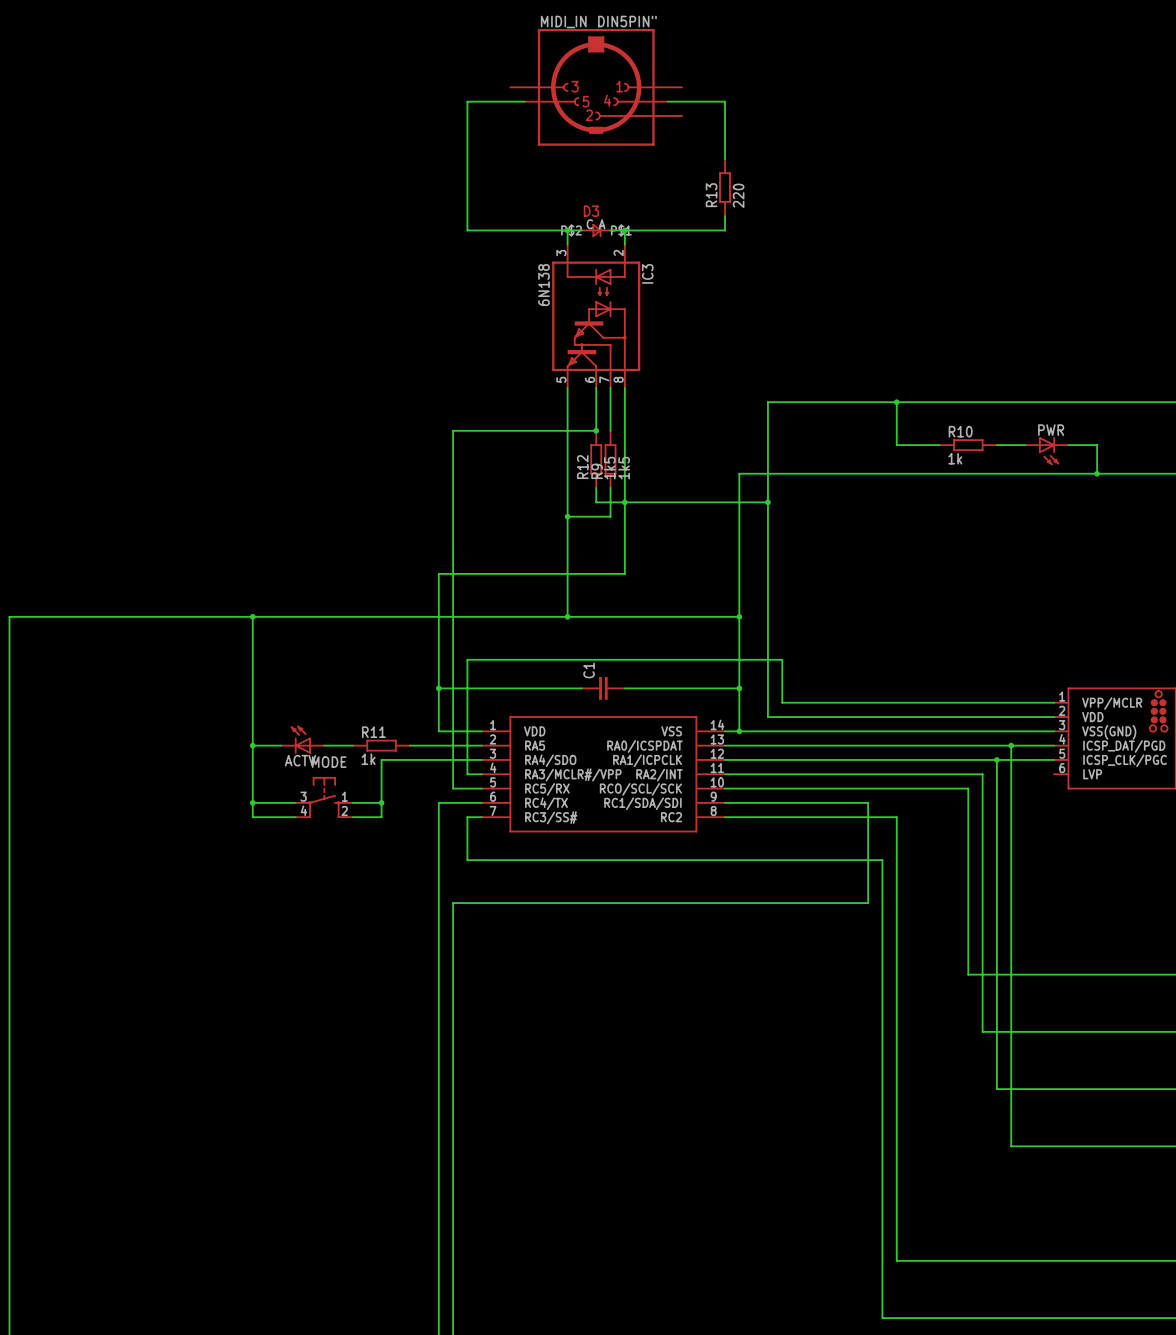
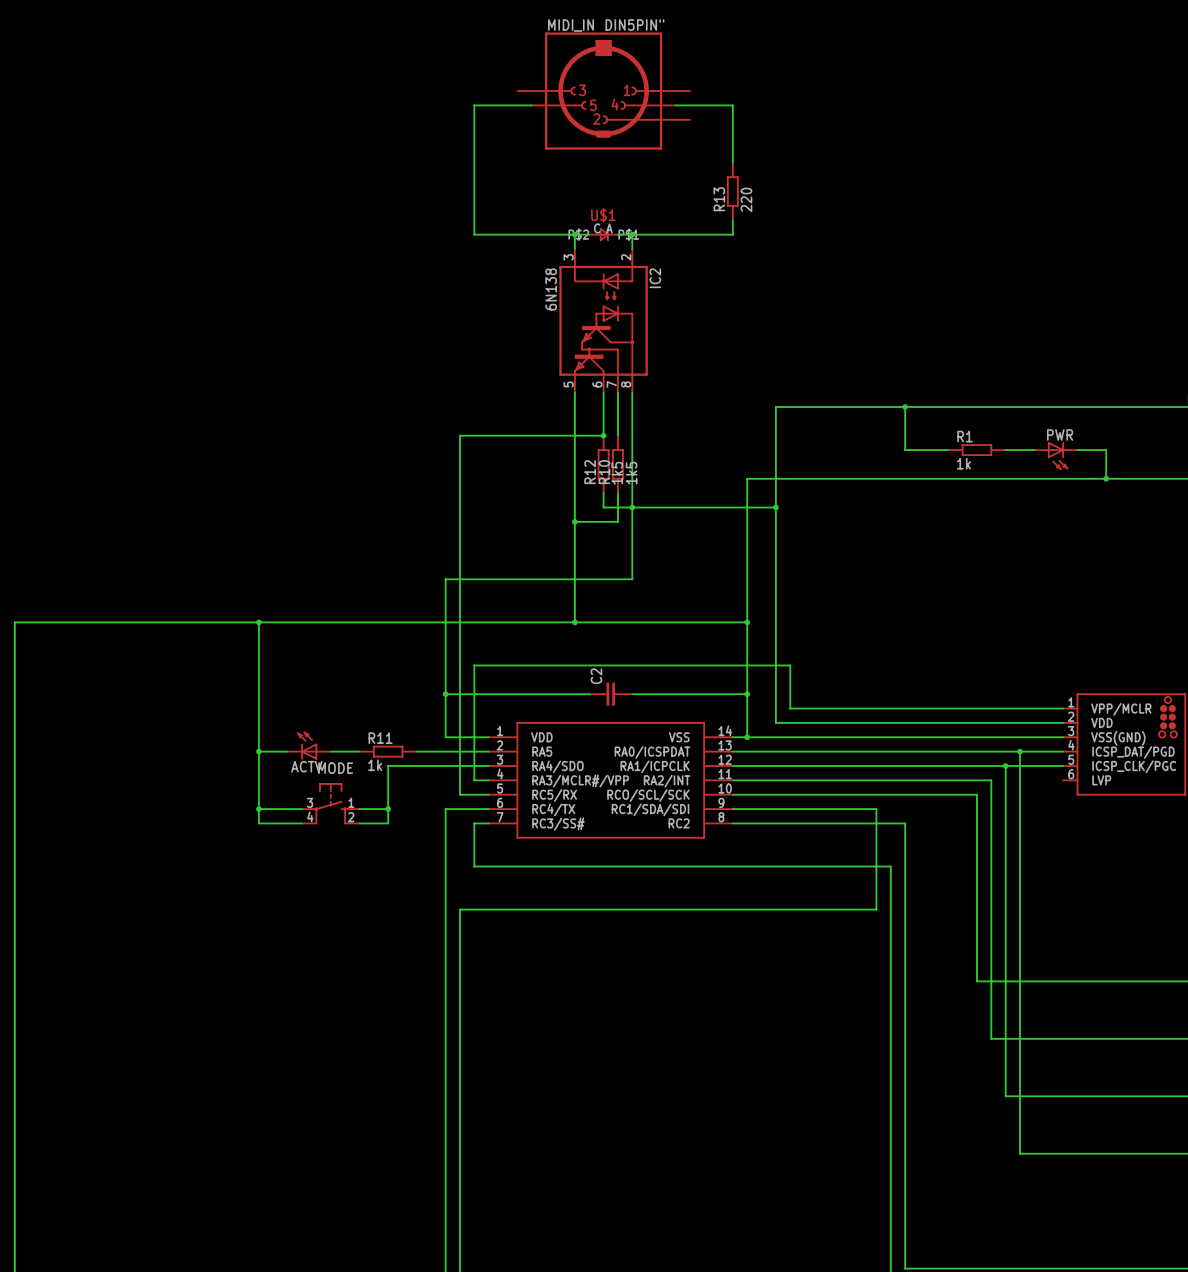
D3 name: D3 (591, 211) -> U$1 (603, 215)
IC3 name: IC3 (647, 273) -> IC2 (655, 278)
R10 name: R10 (960, 431) -> R1 (965, 436)
R9 name: R9 (597, 471) -> R10 (604, 472)
C1 name: C1 (589, 670) -> C2 (596, 676)

